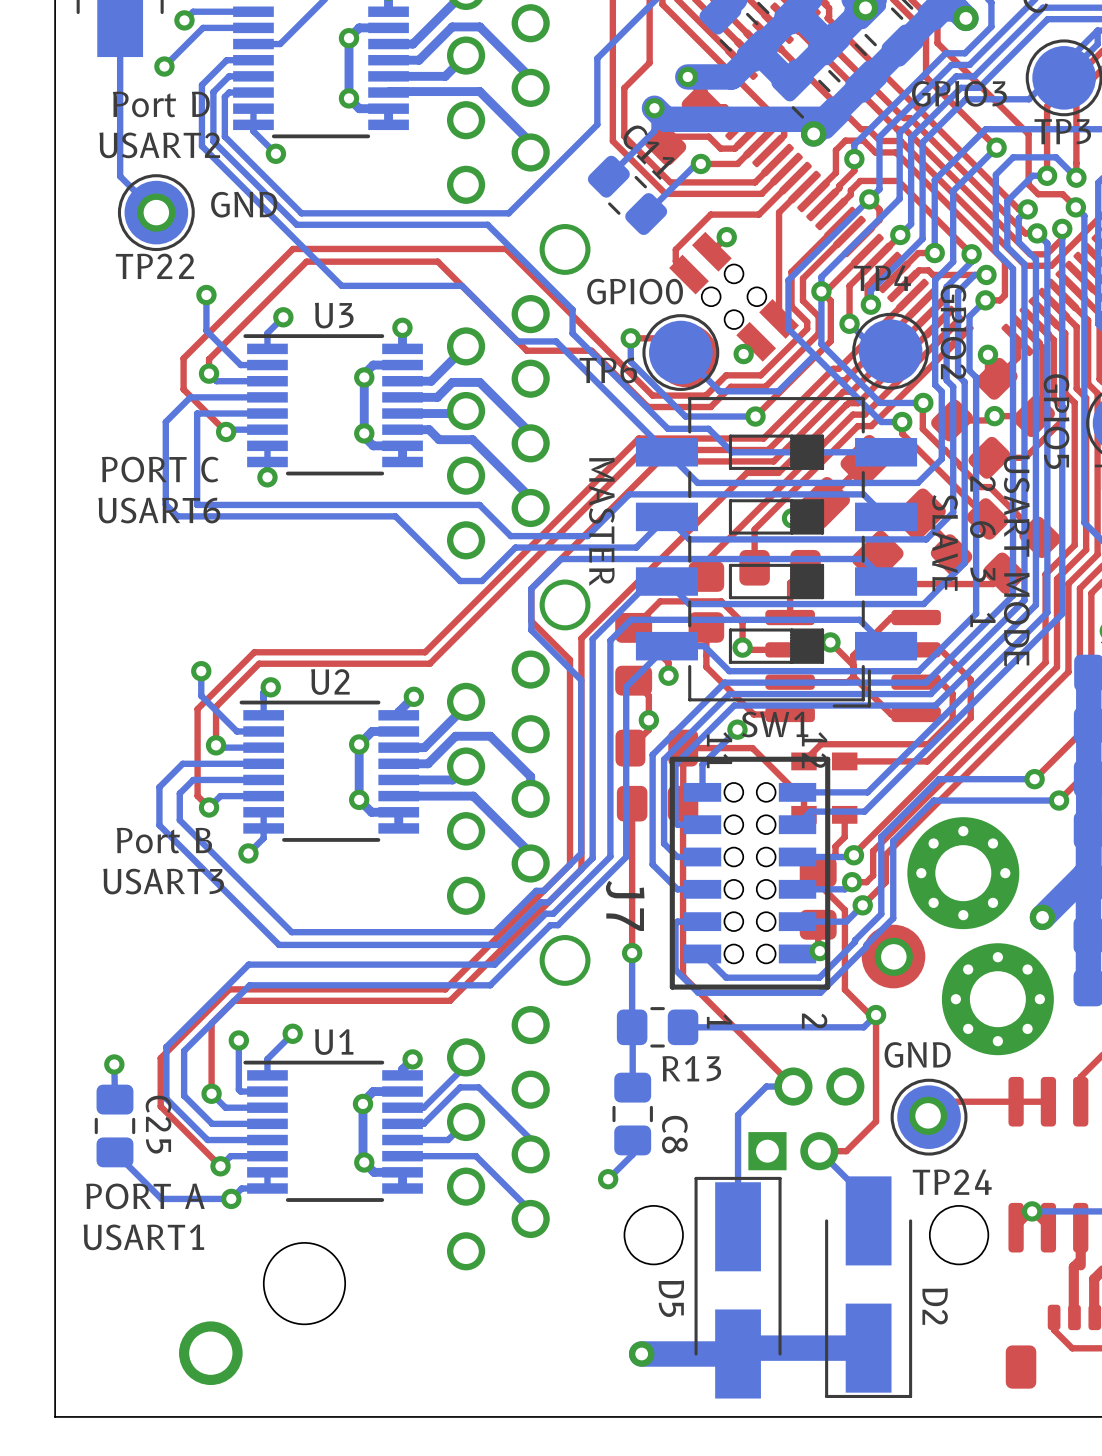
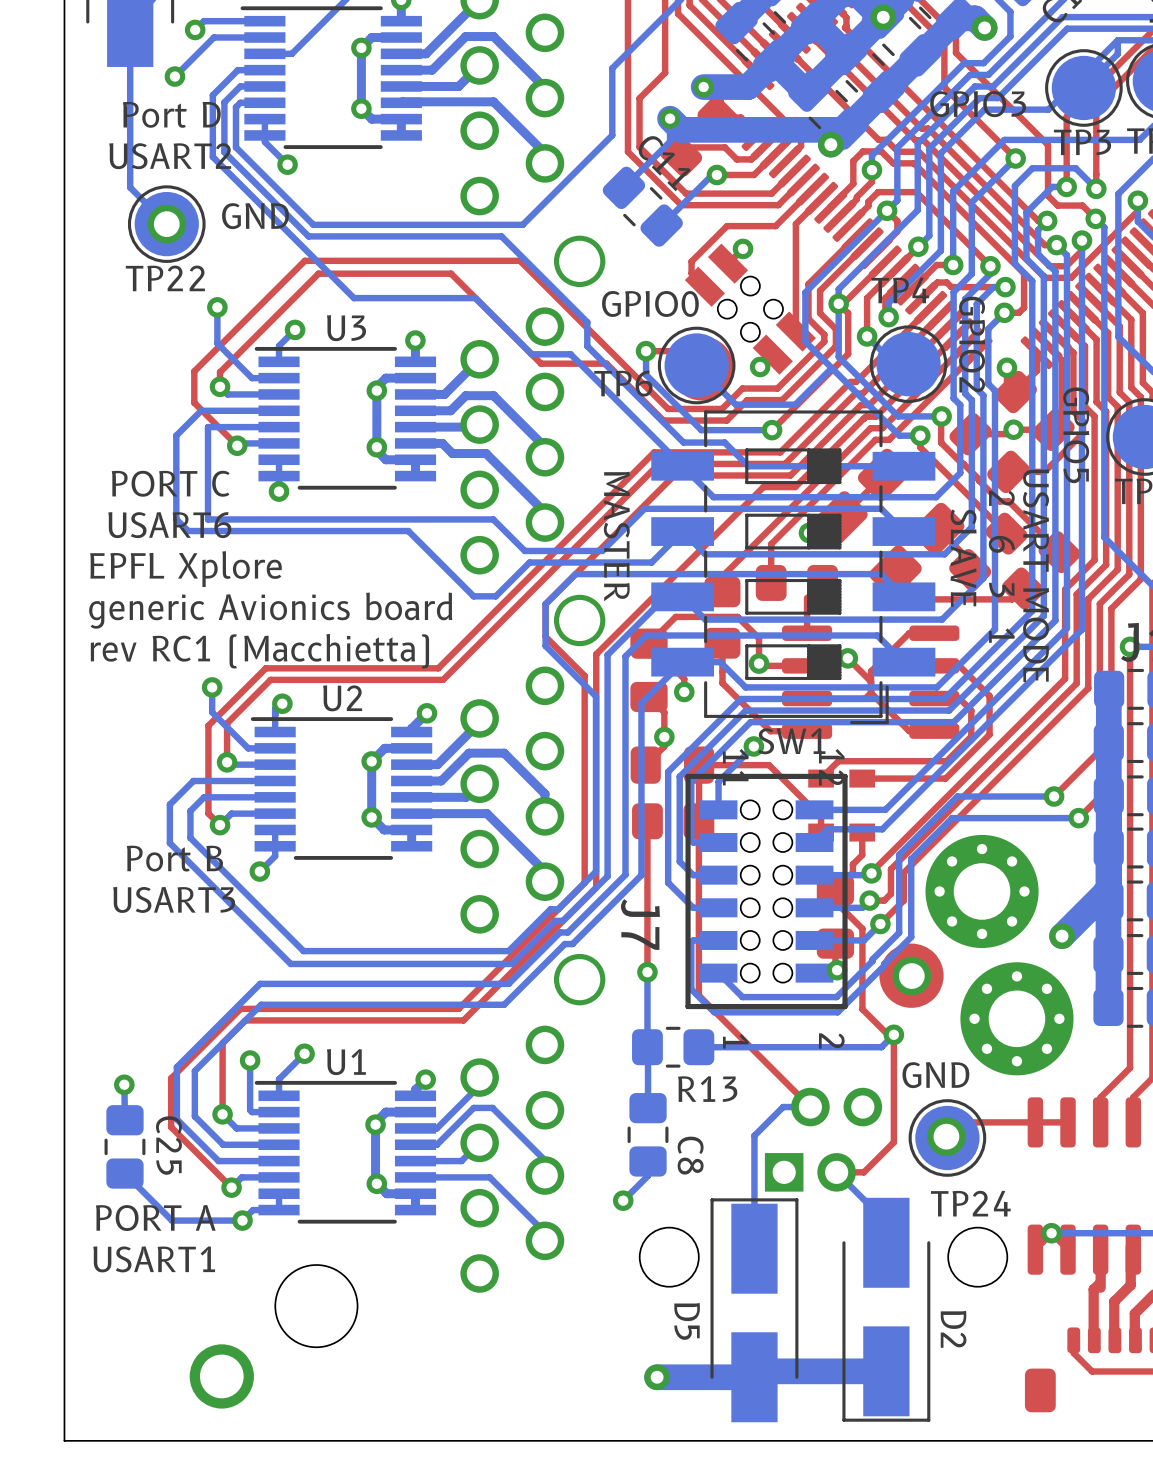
text: none -> EPFL Xplore (185, 569)
text: none -> generic Avionics board (270, 610)
text: none -> rev RC1 (Macchietta) (259, 651)

